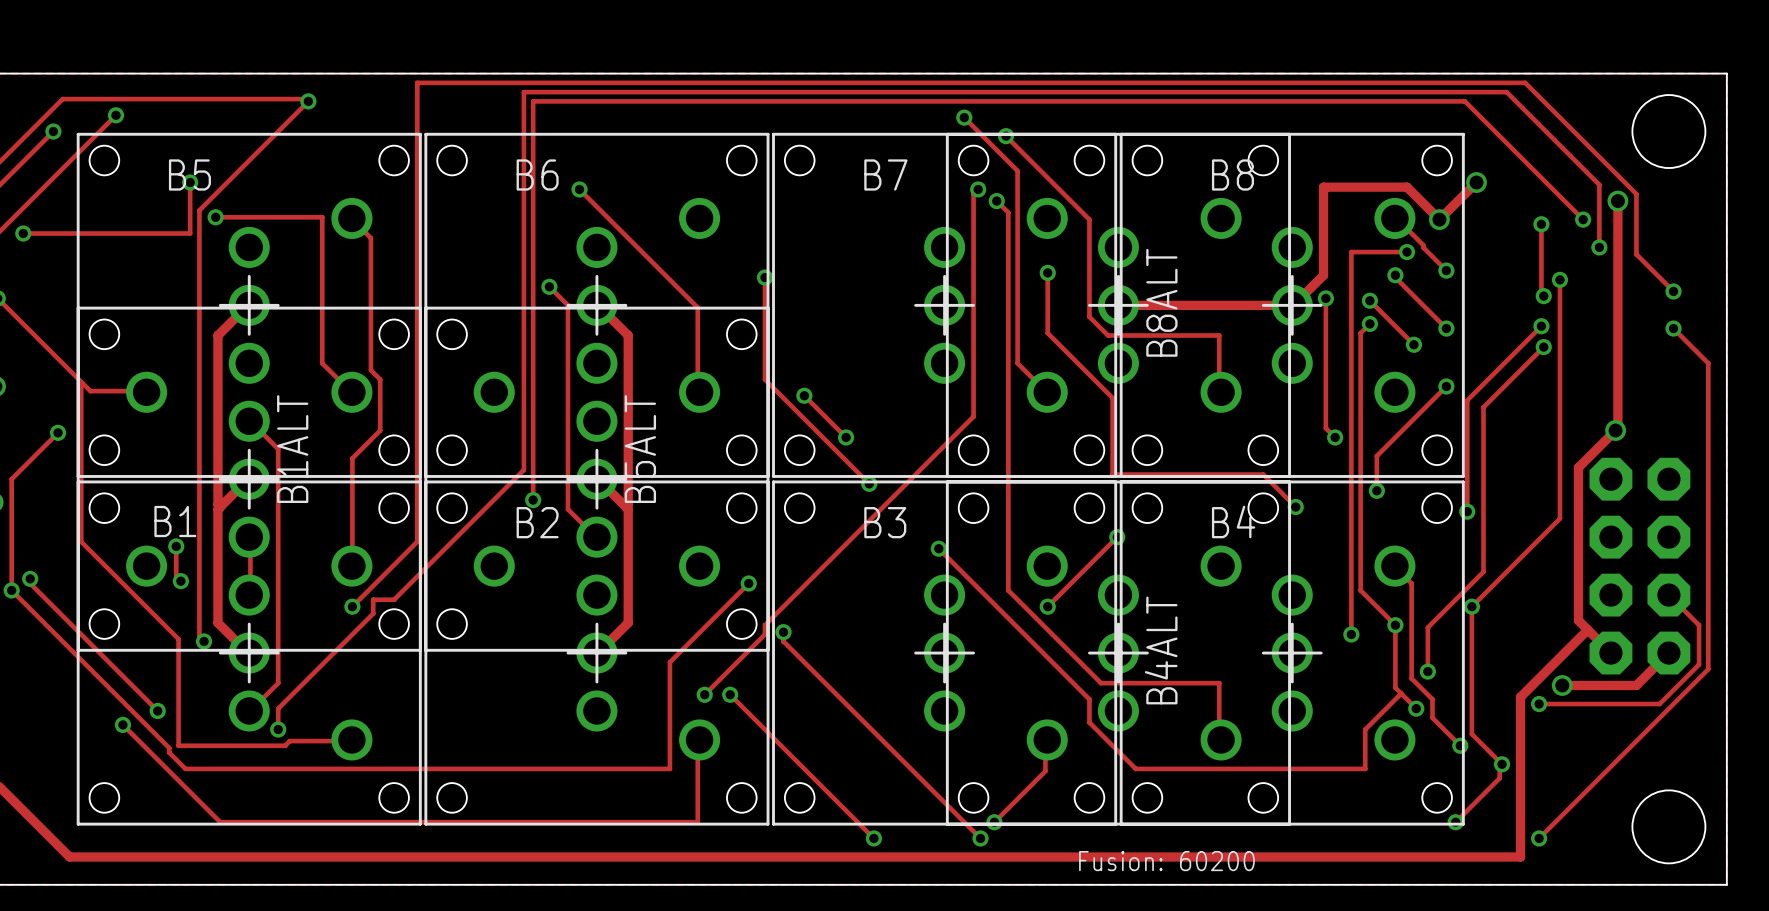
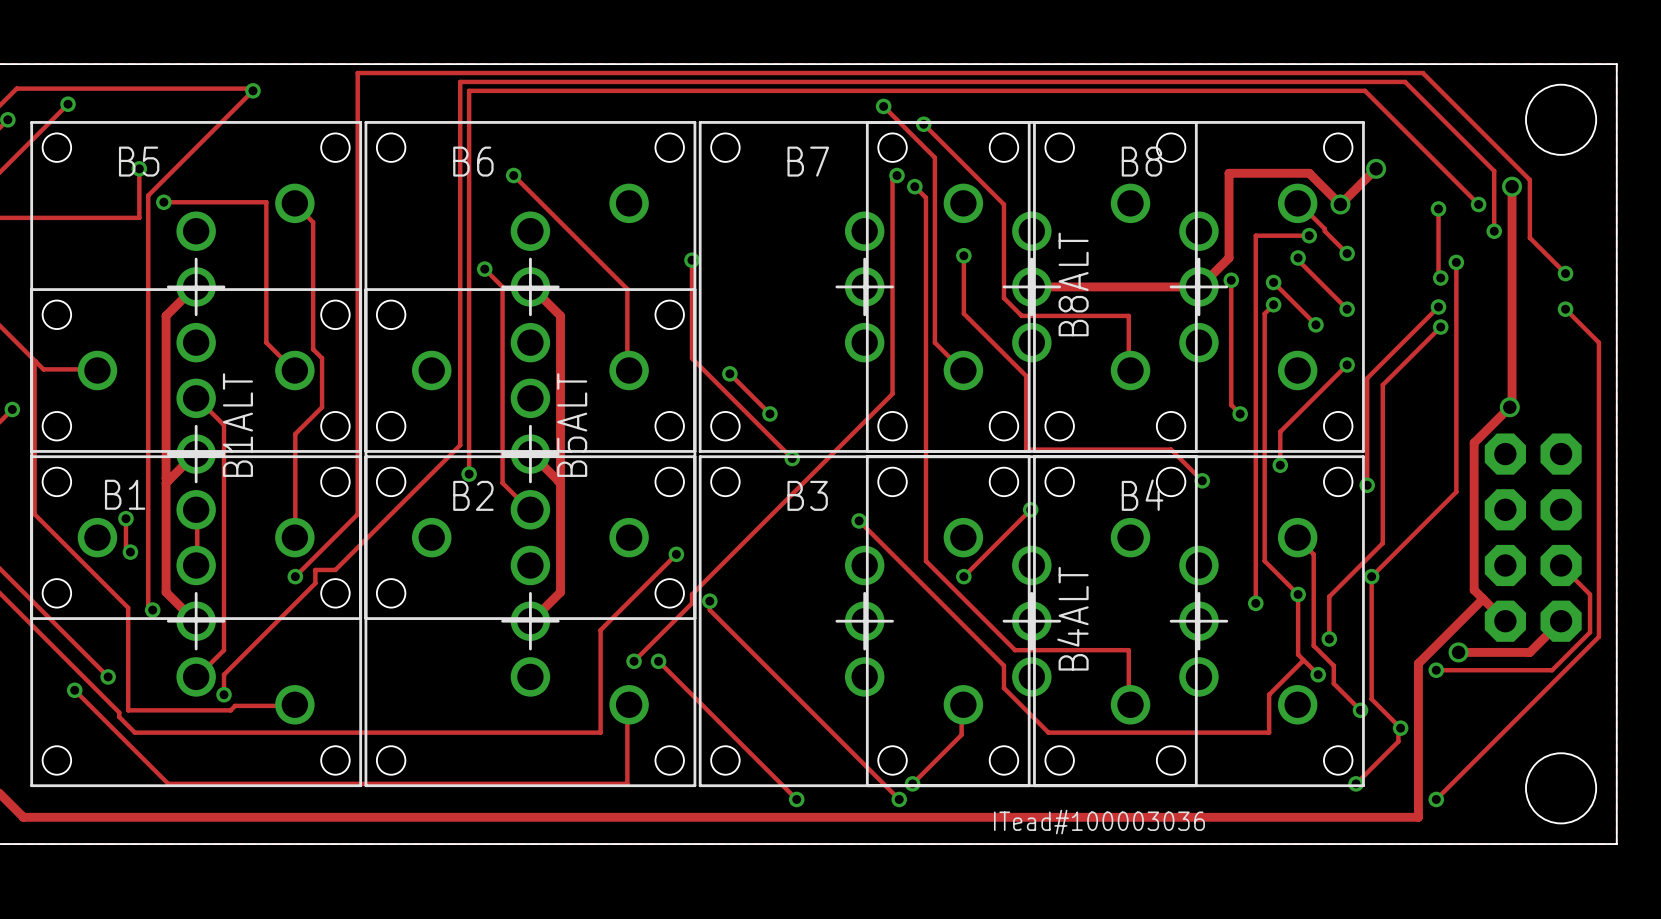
text: Fusion: 60200 (1166, 861) -> ITead#100003036 (1099, 822)

